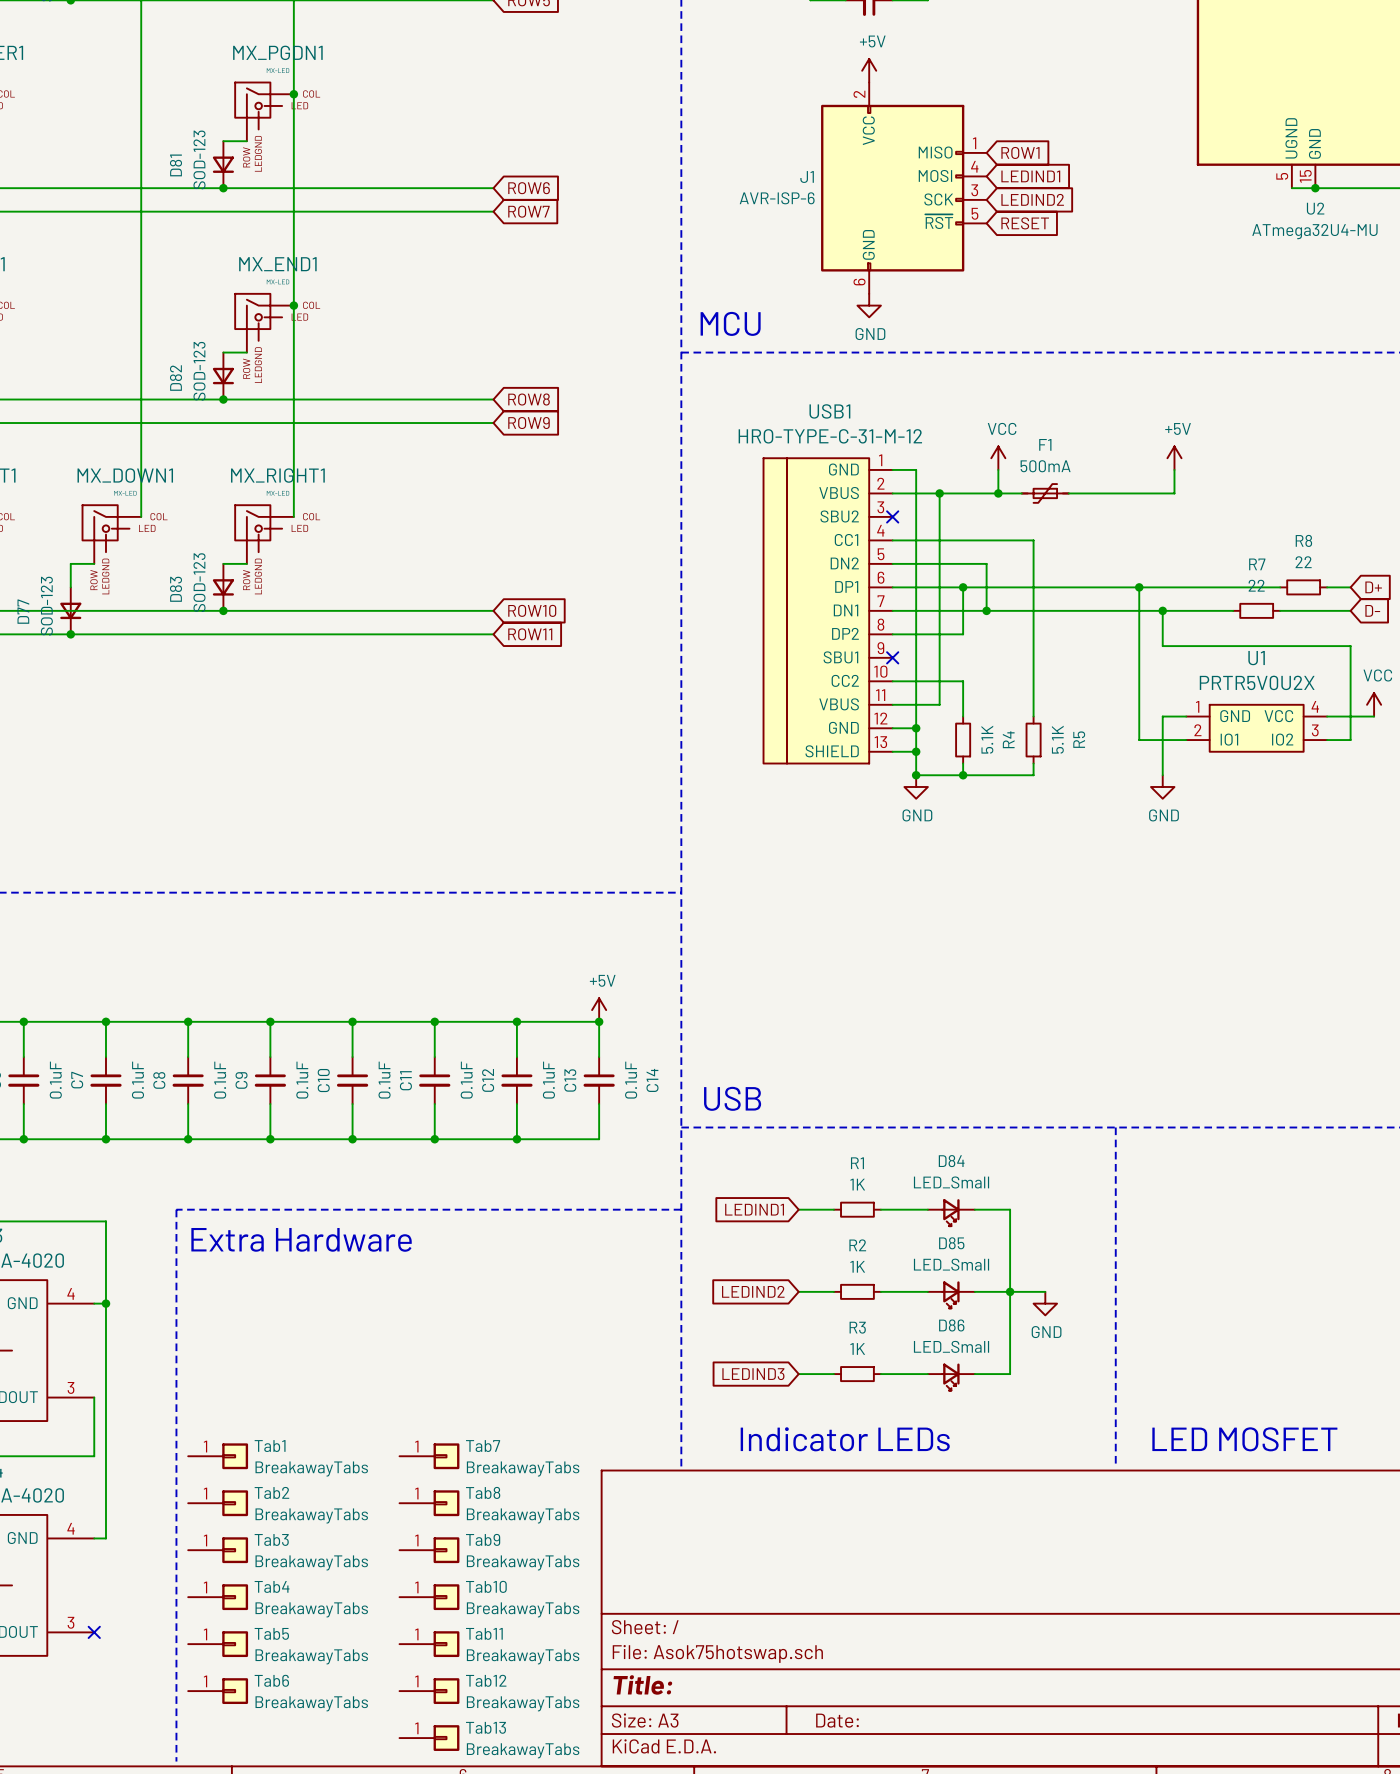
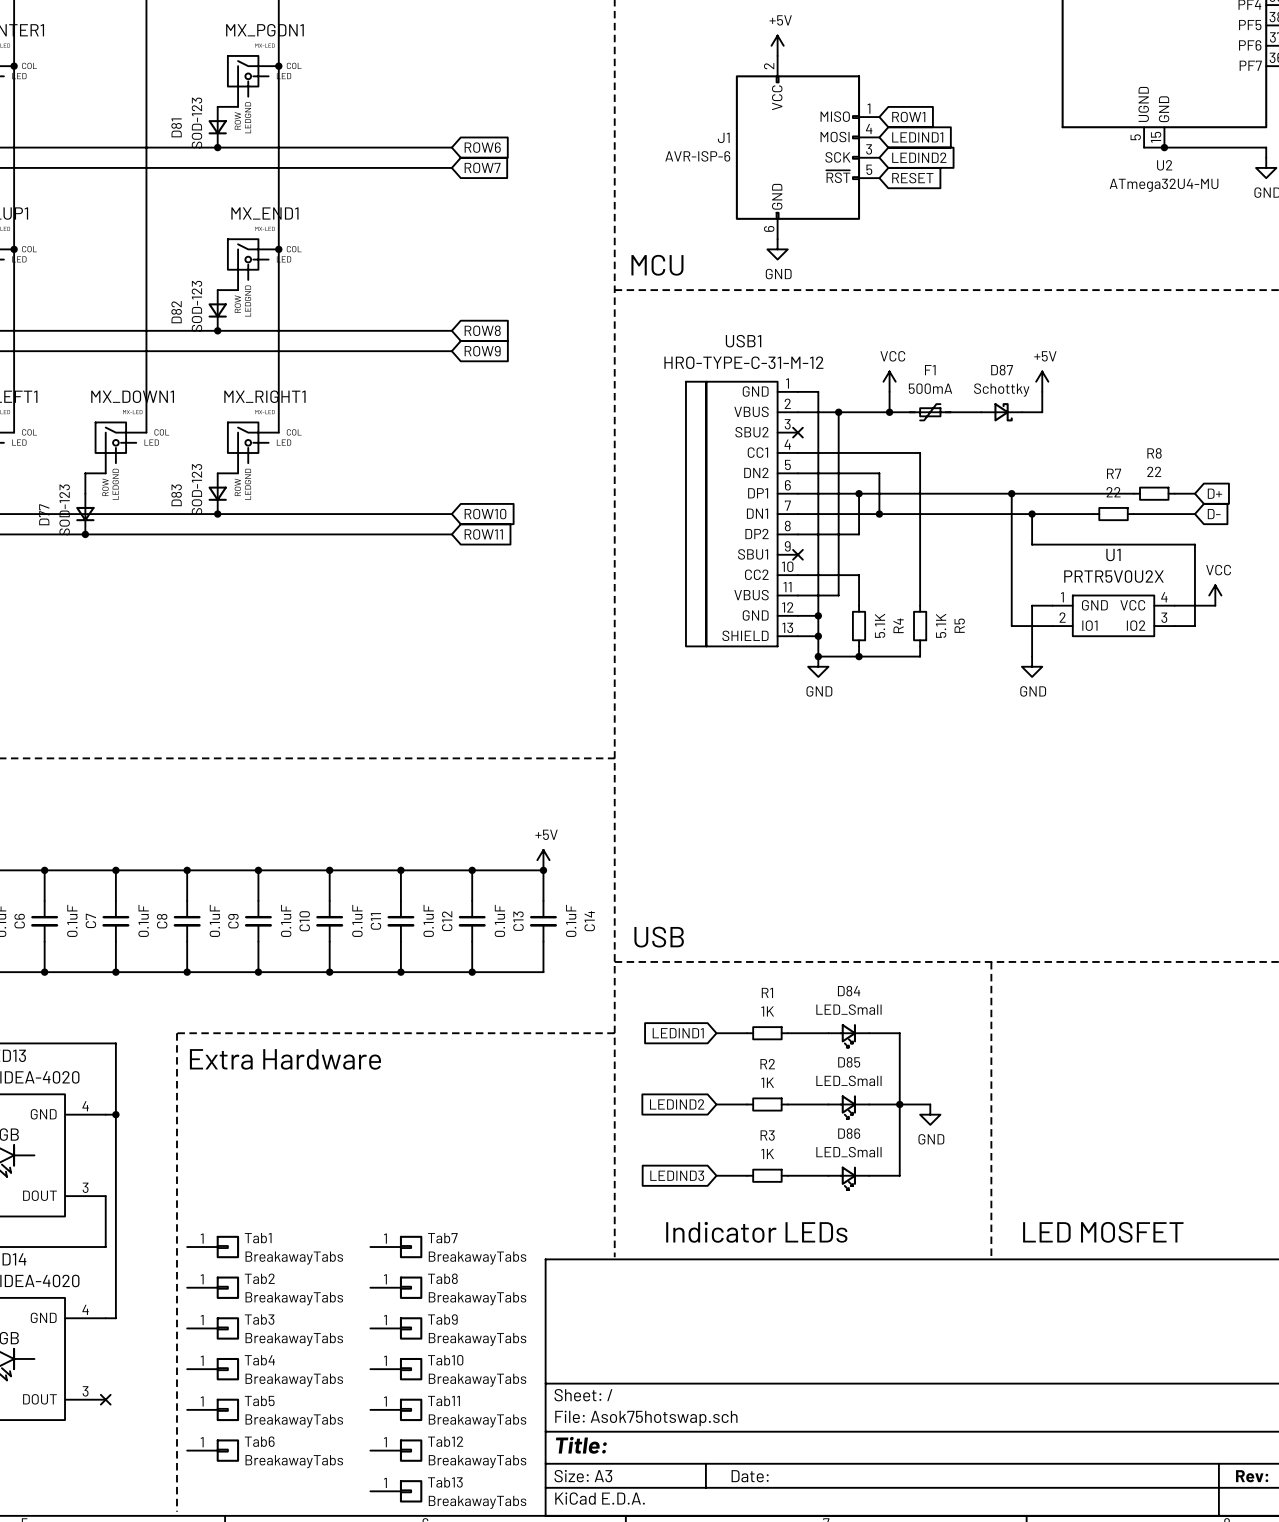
D87: none -> Schottky (1001, 412)

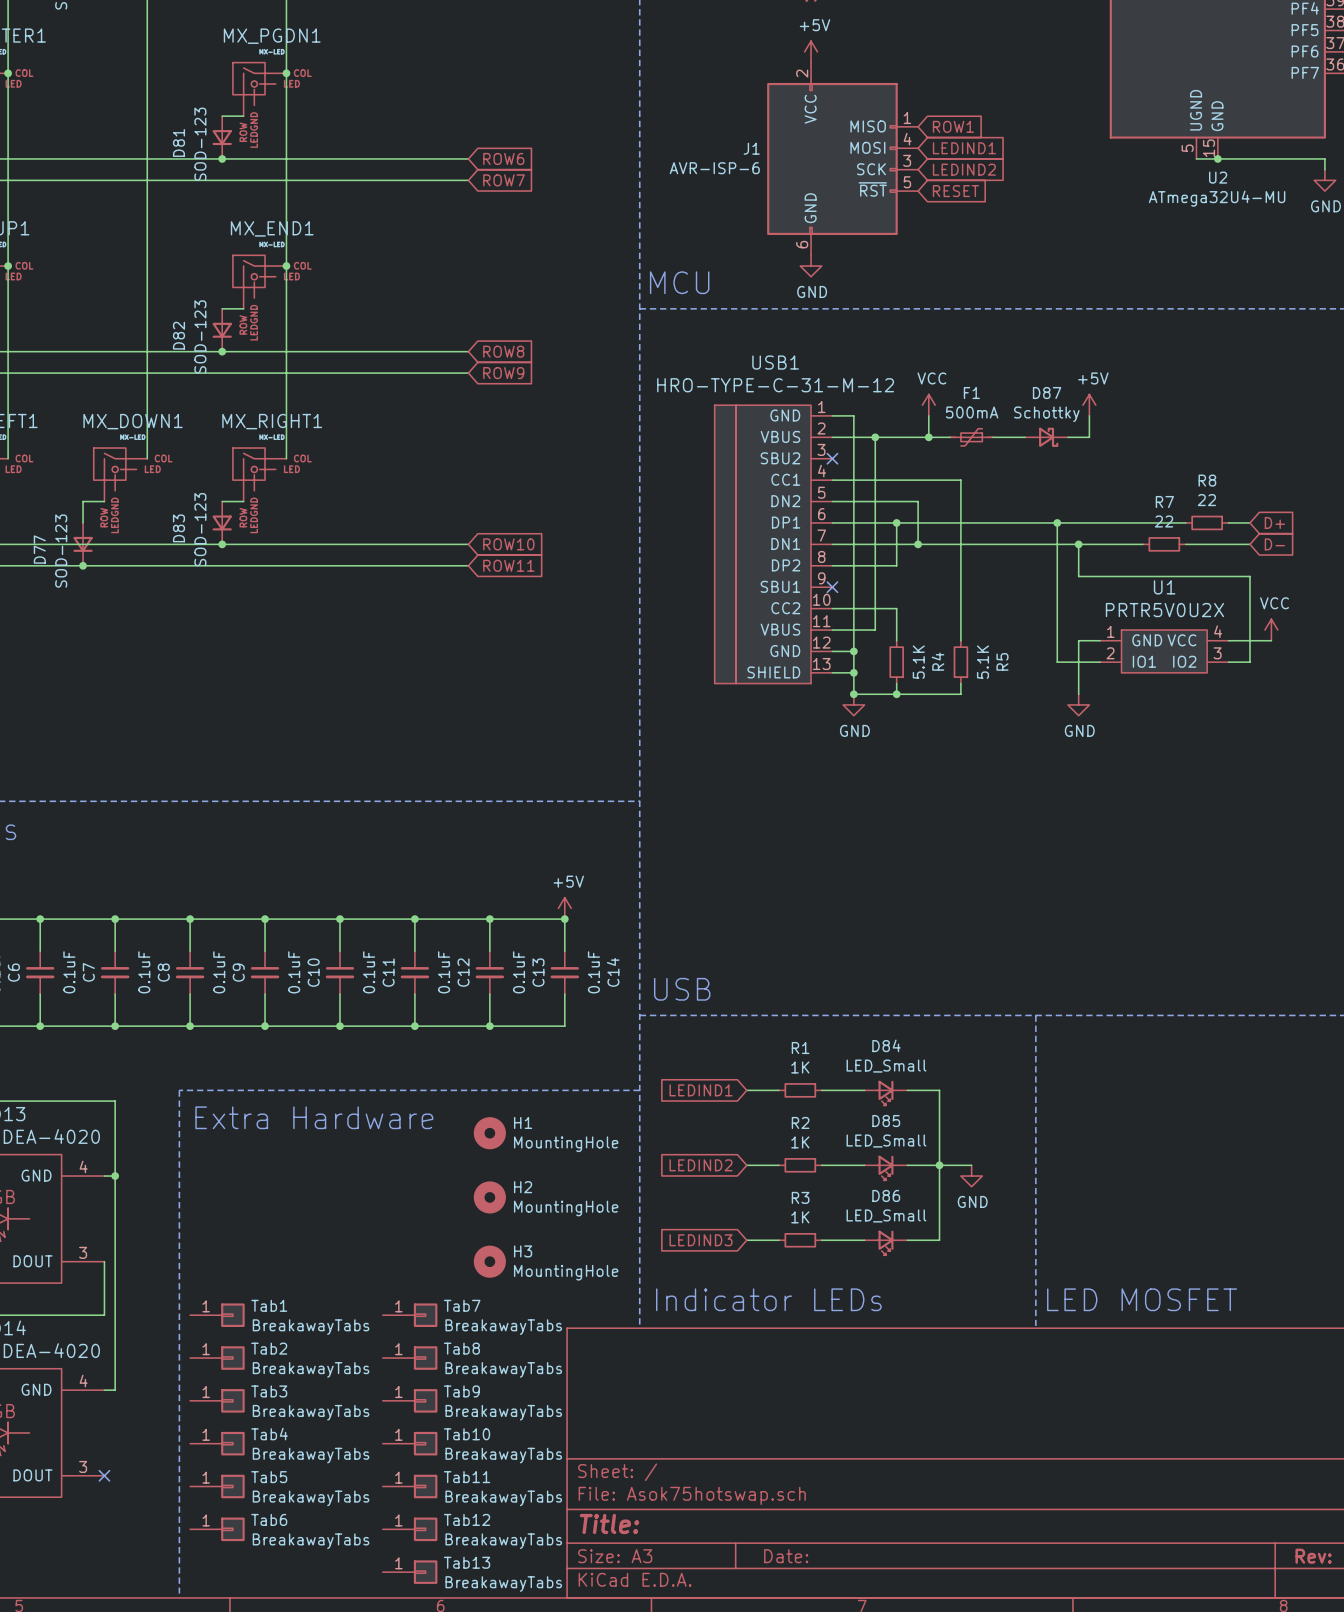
H1: none -> MountingHole (489, 1133)
H2: none -> MountingHole (489, 1197)
H3: none -> MountingHole (489, 1261)

